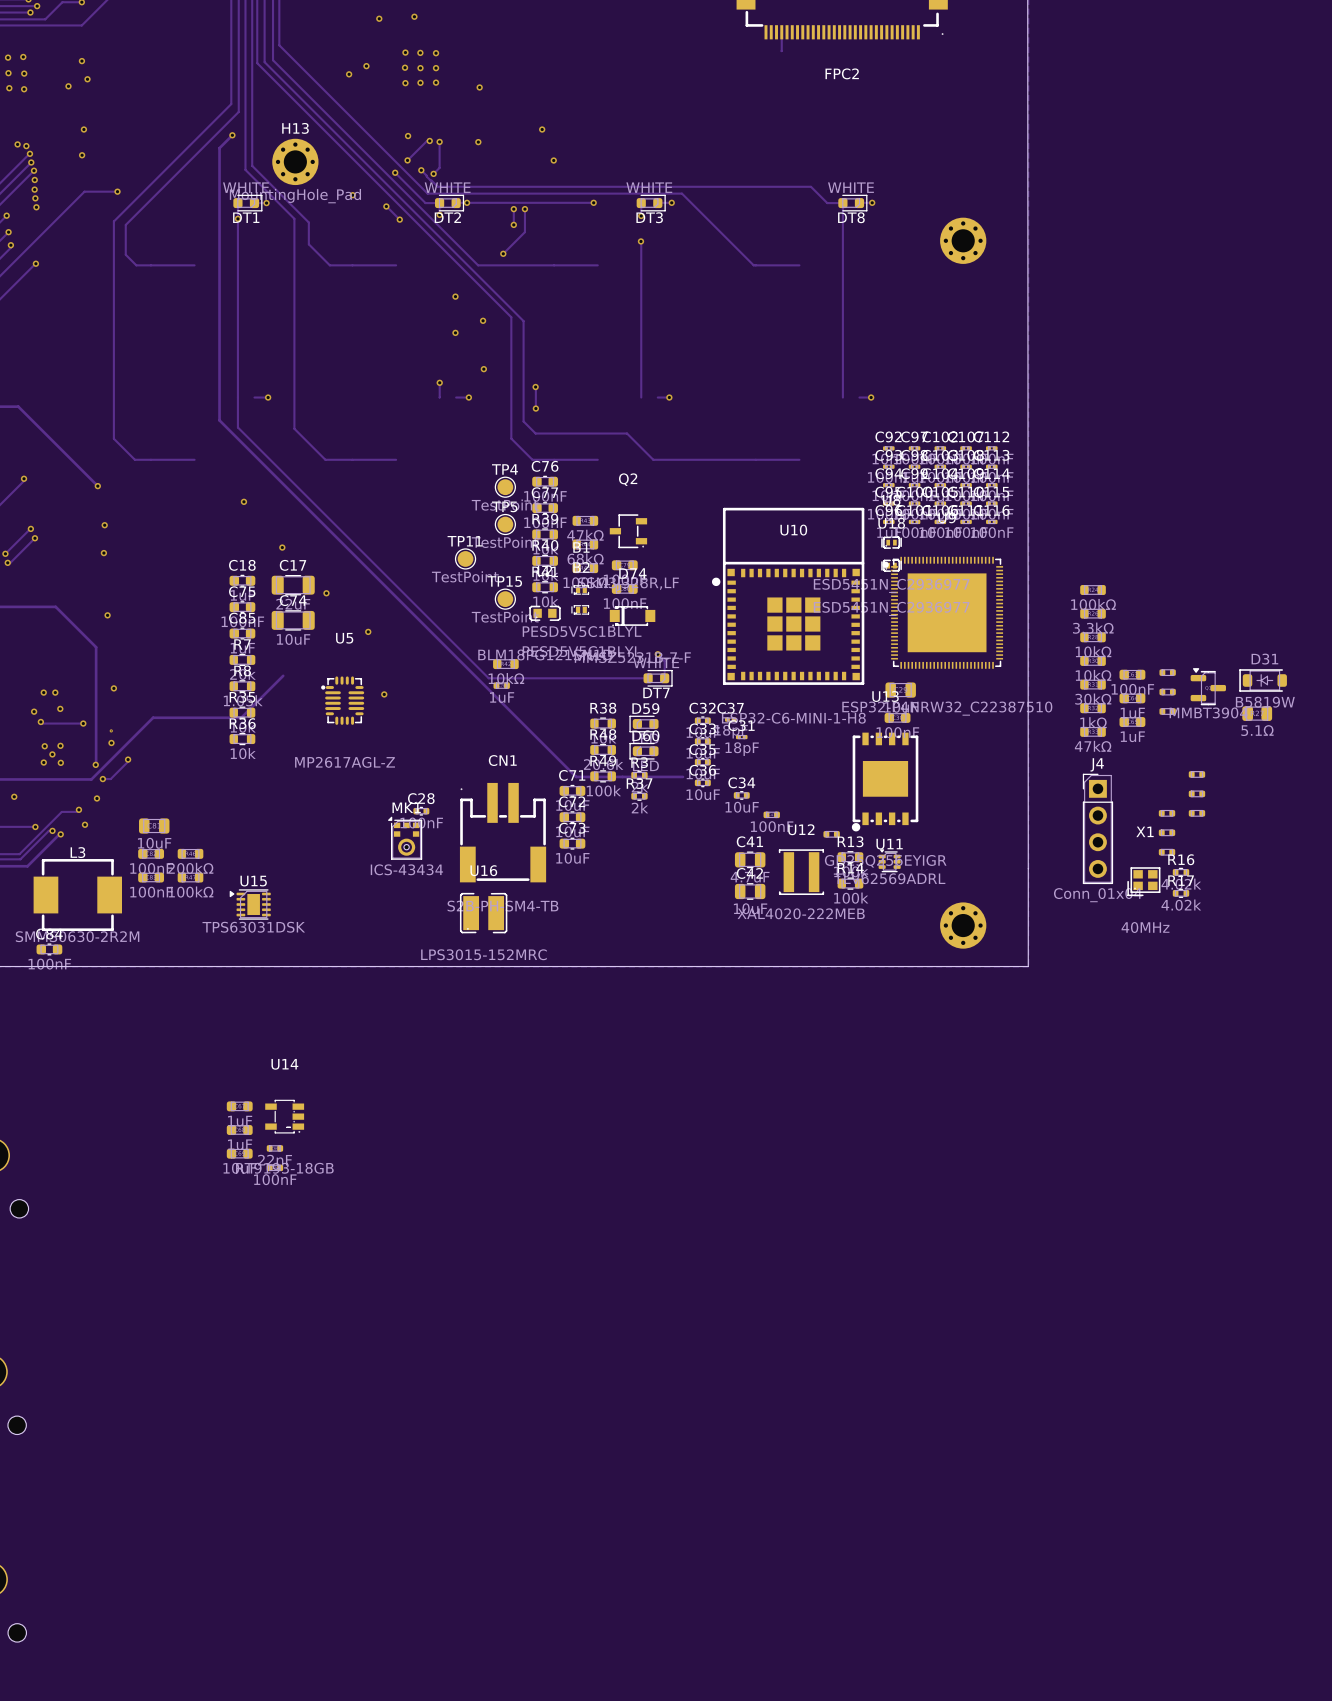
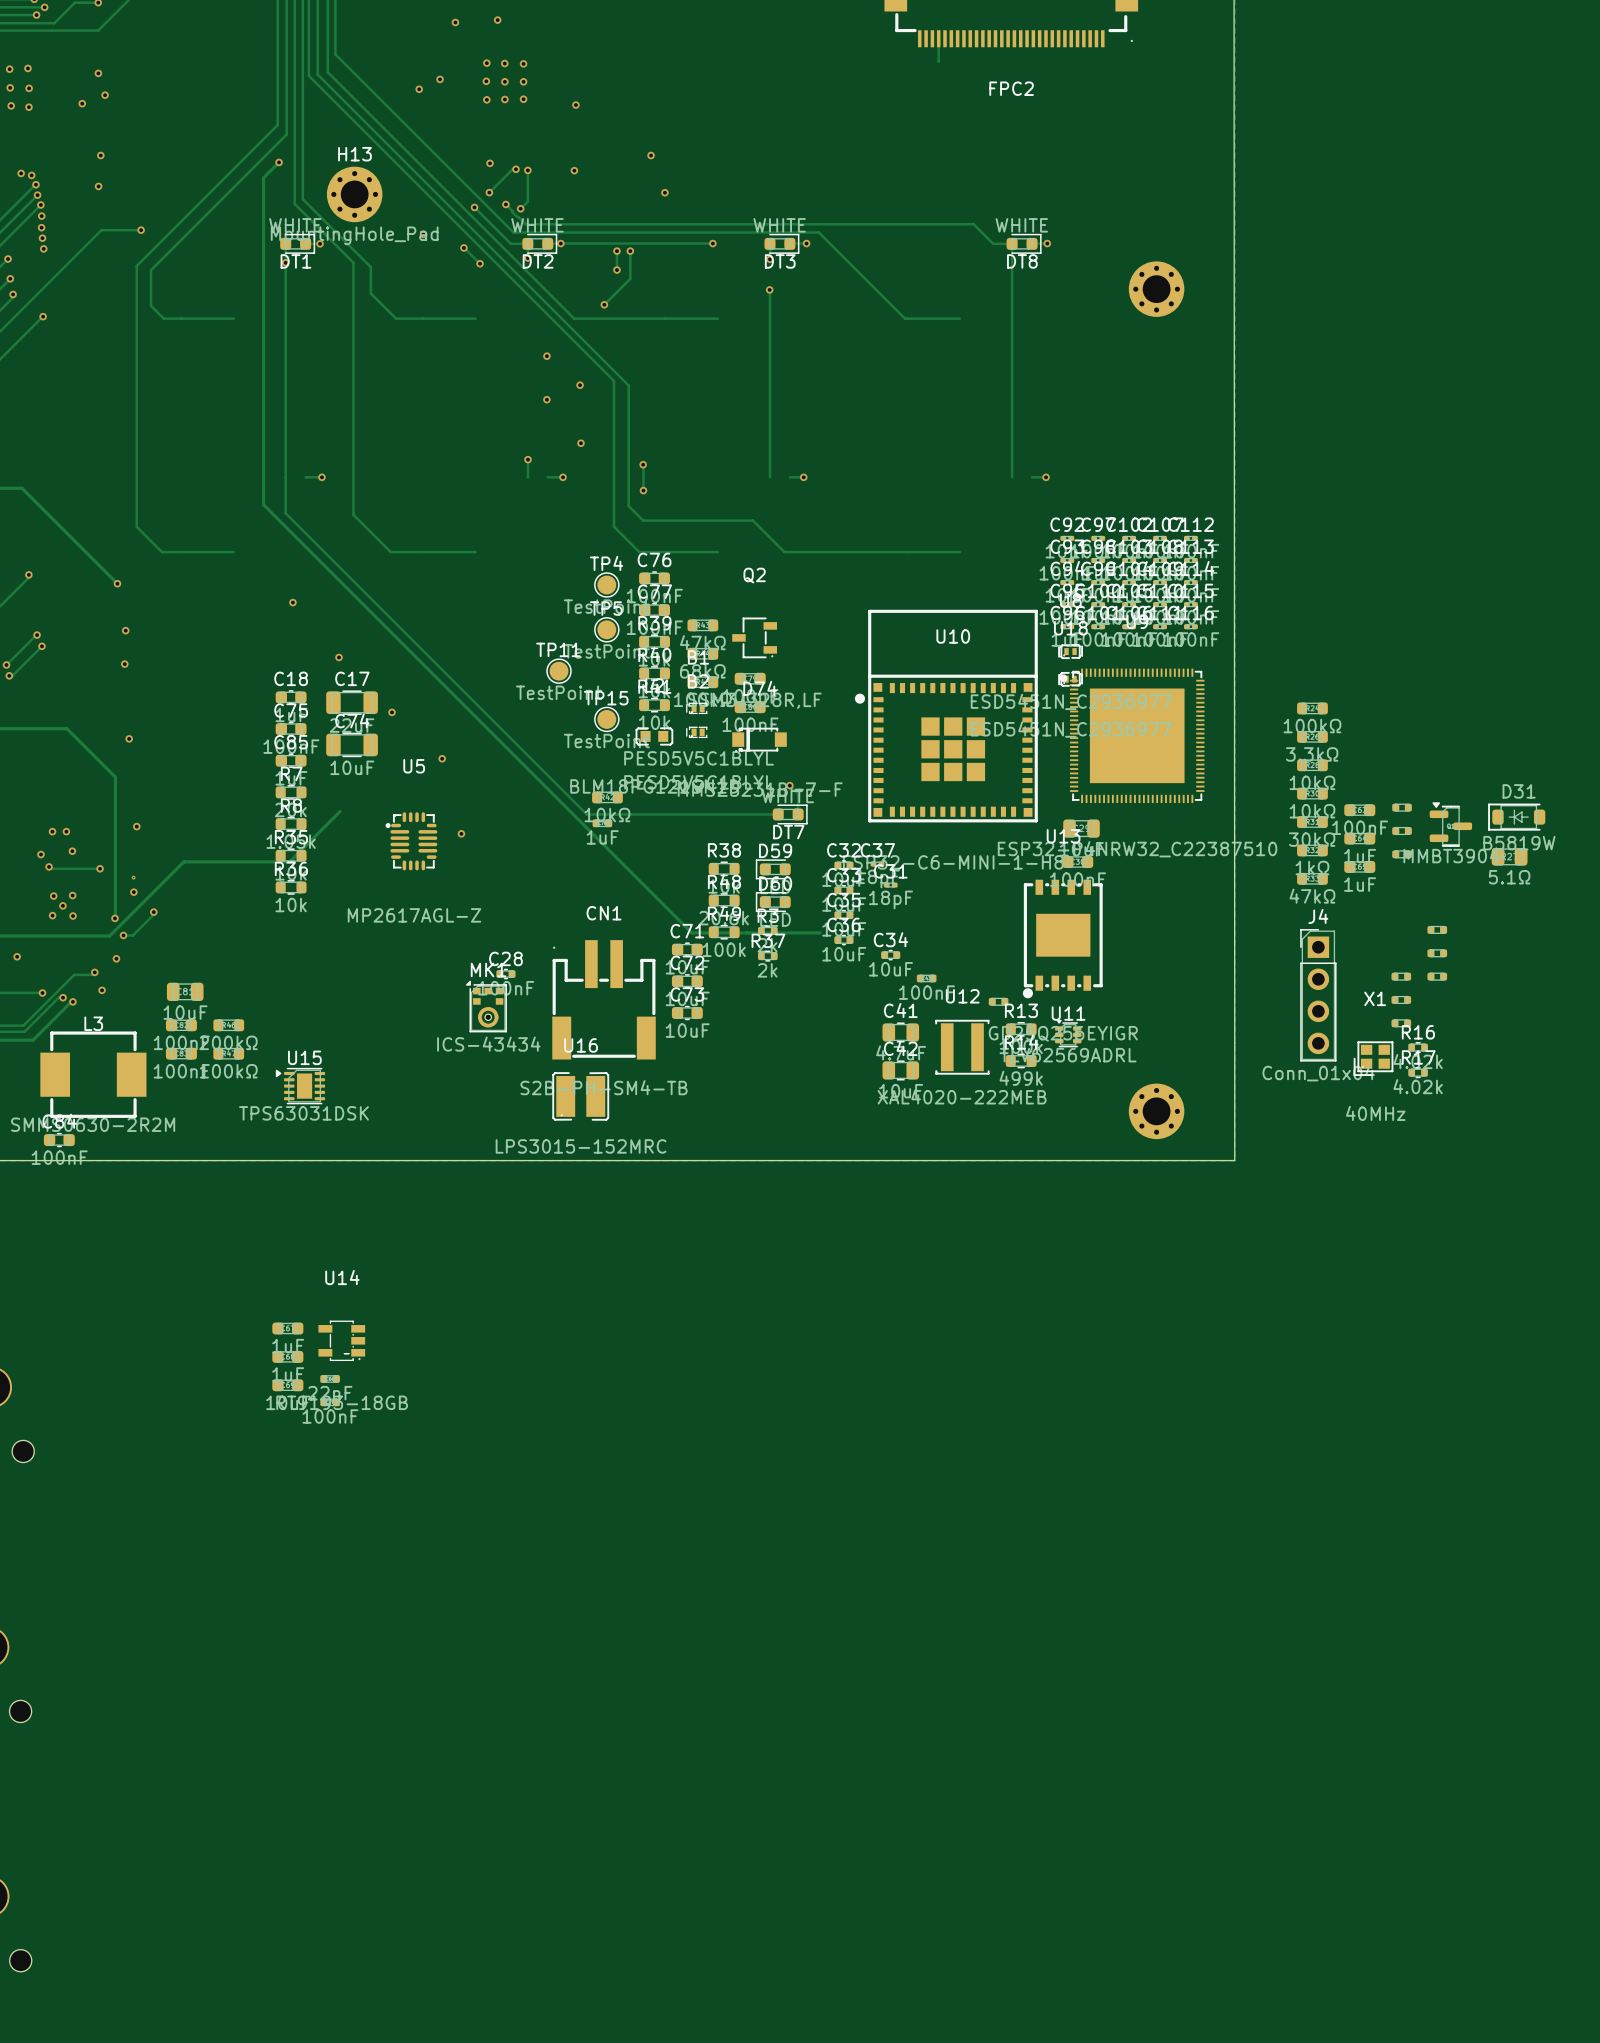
R14 value: 100k (851, 898) -> 499k (1021, 1078)

